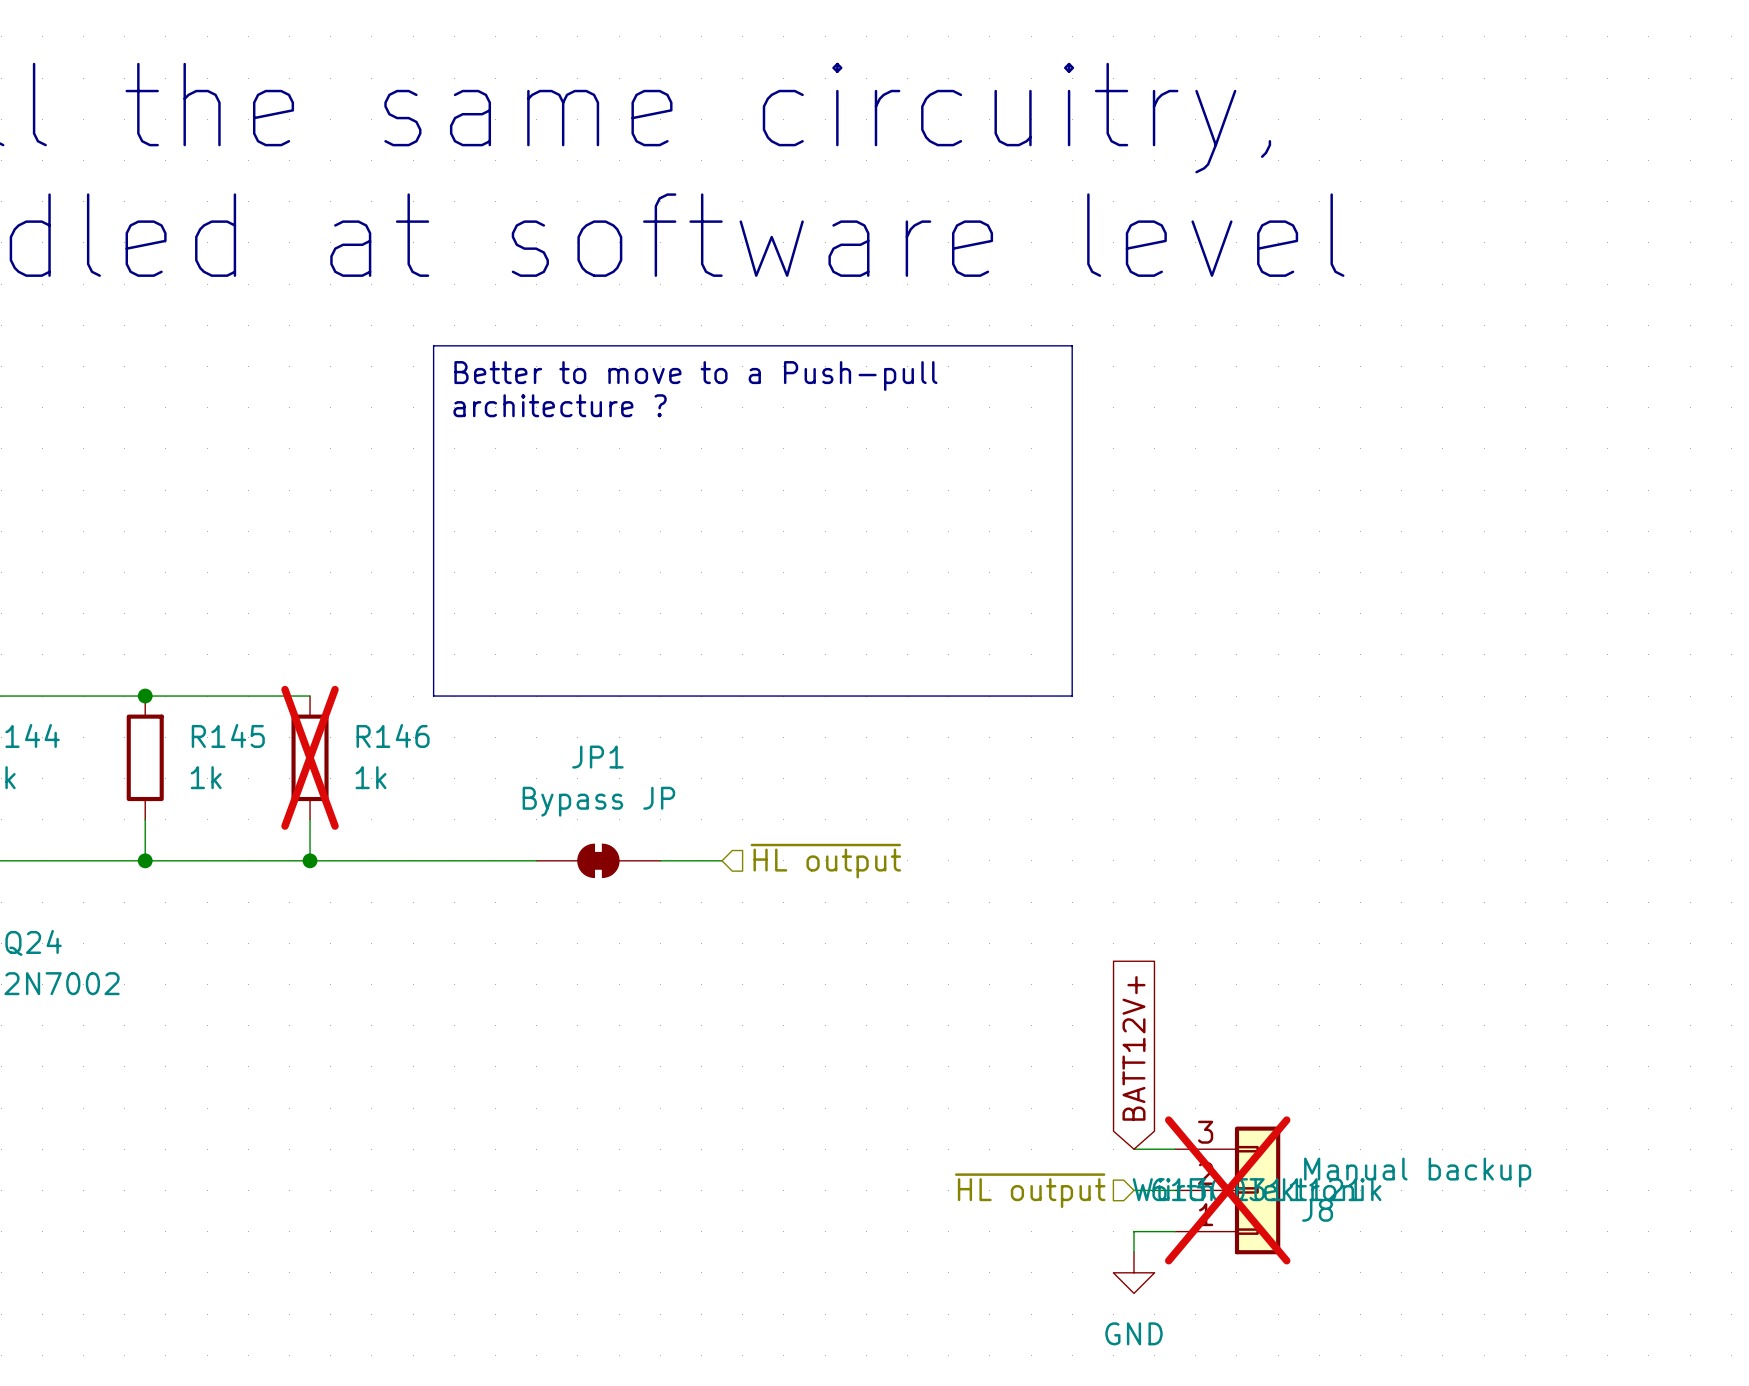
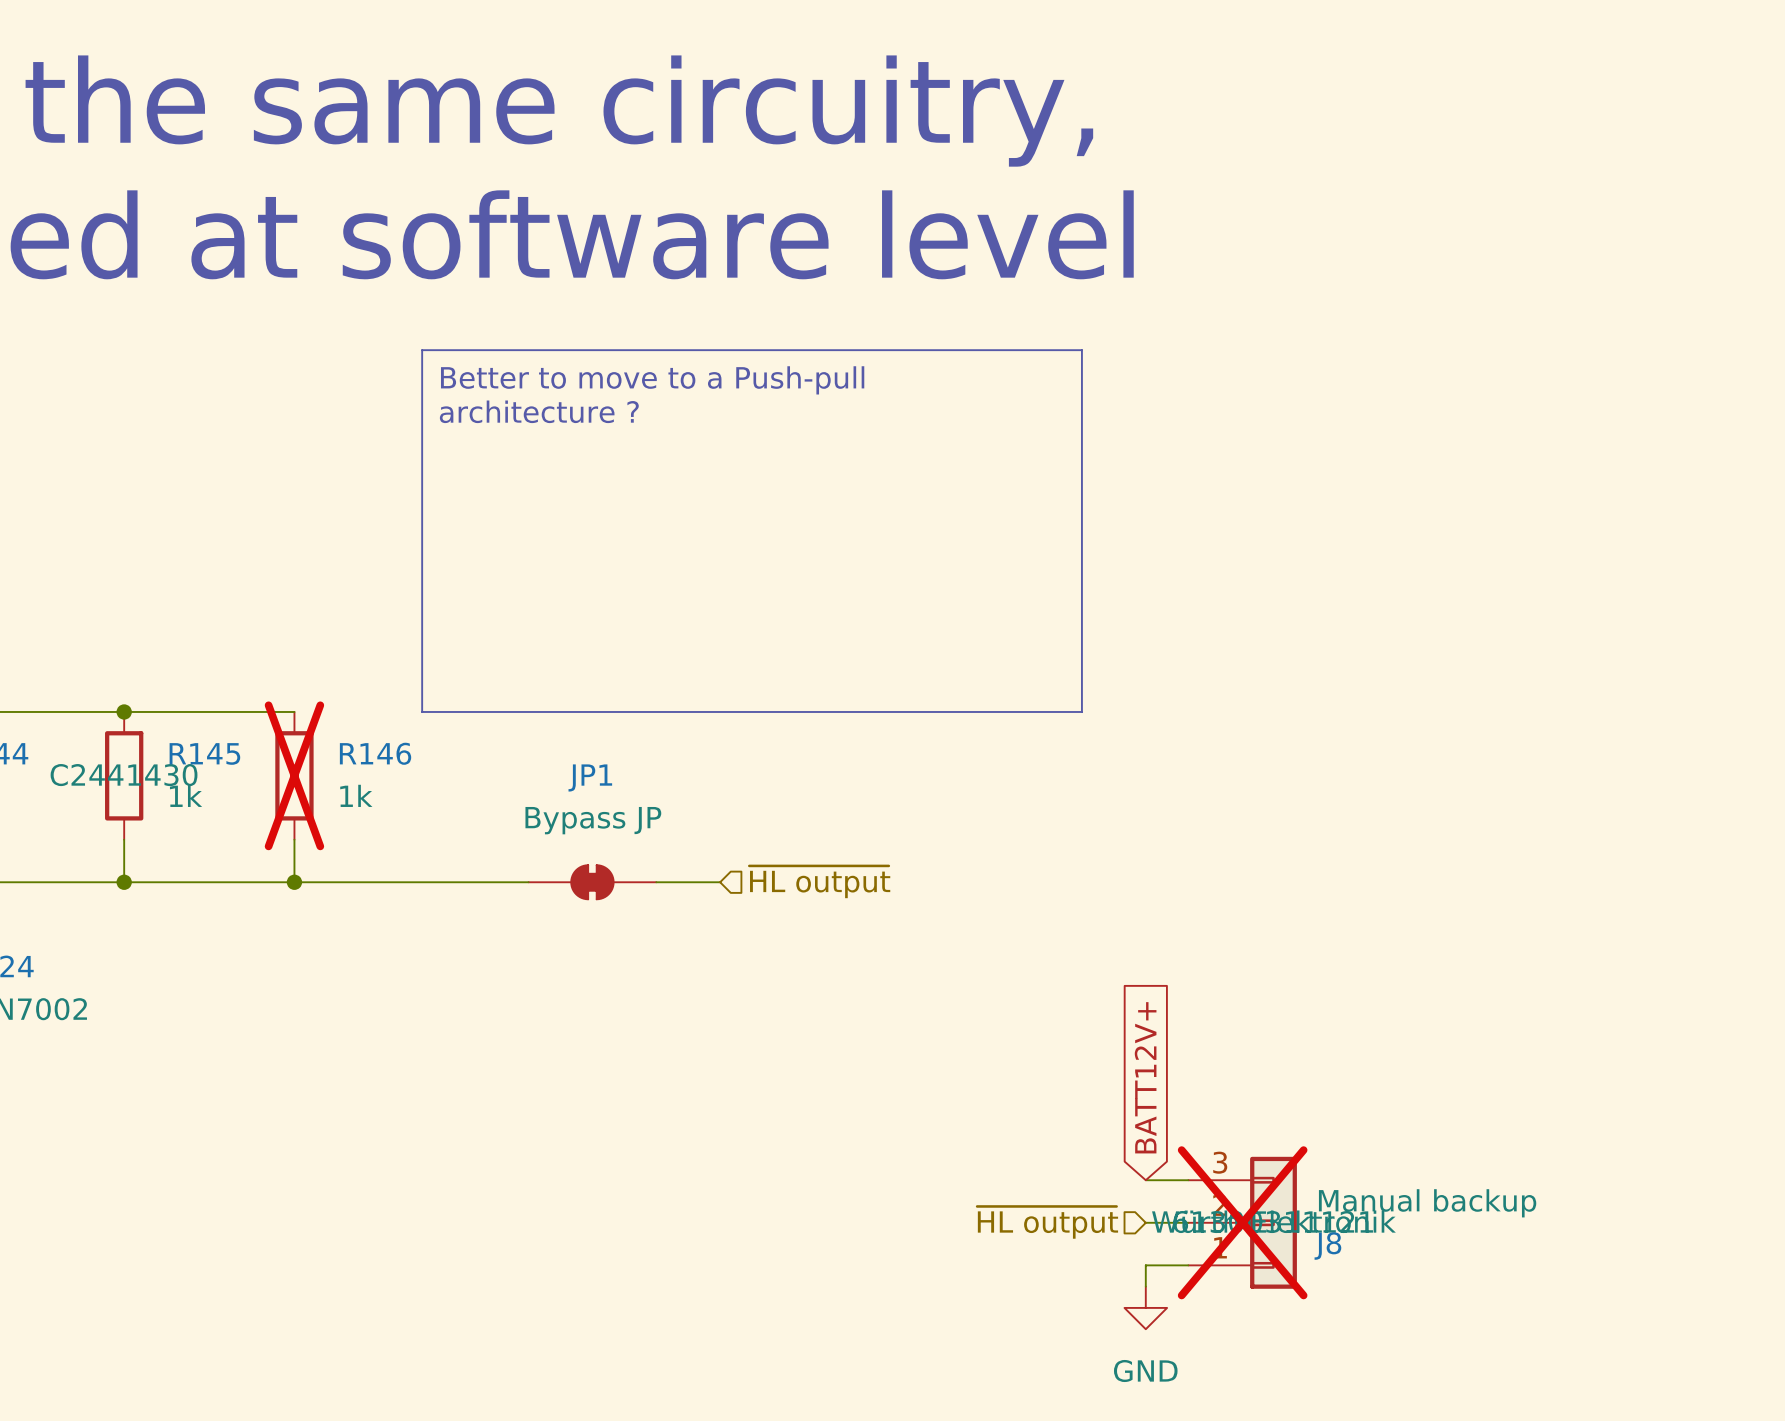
R145 text: none -> C2441430 (124, 775)

